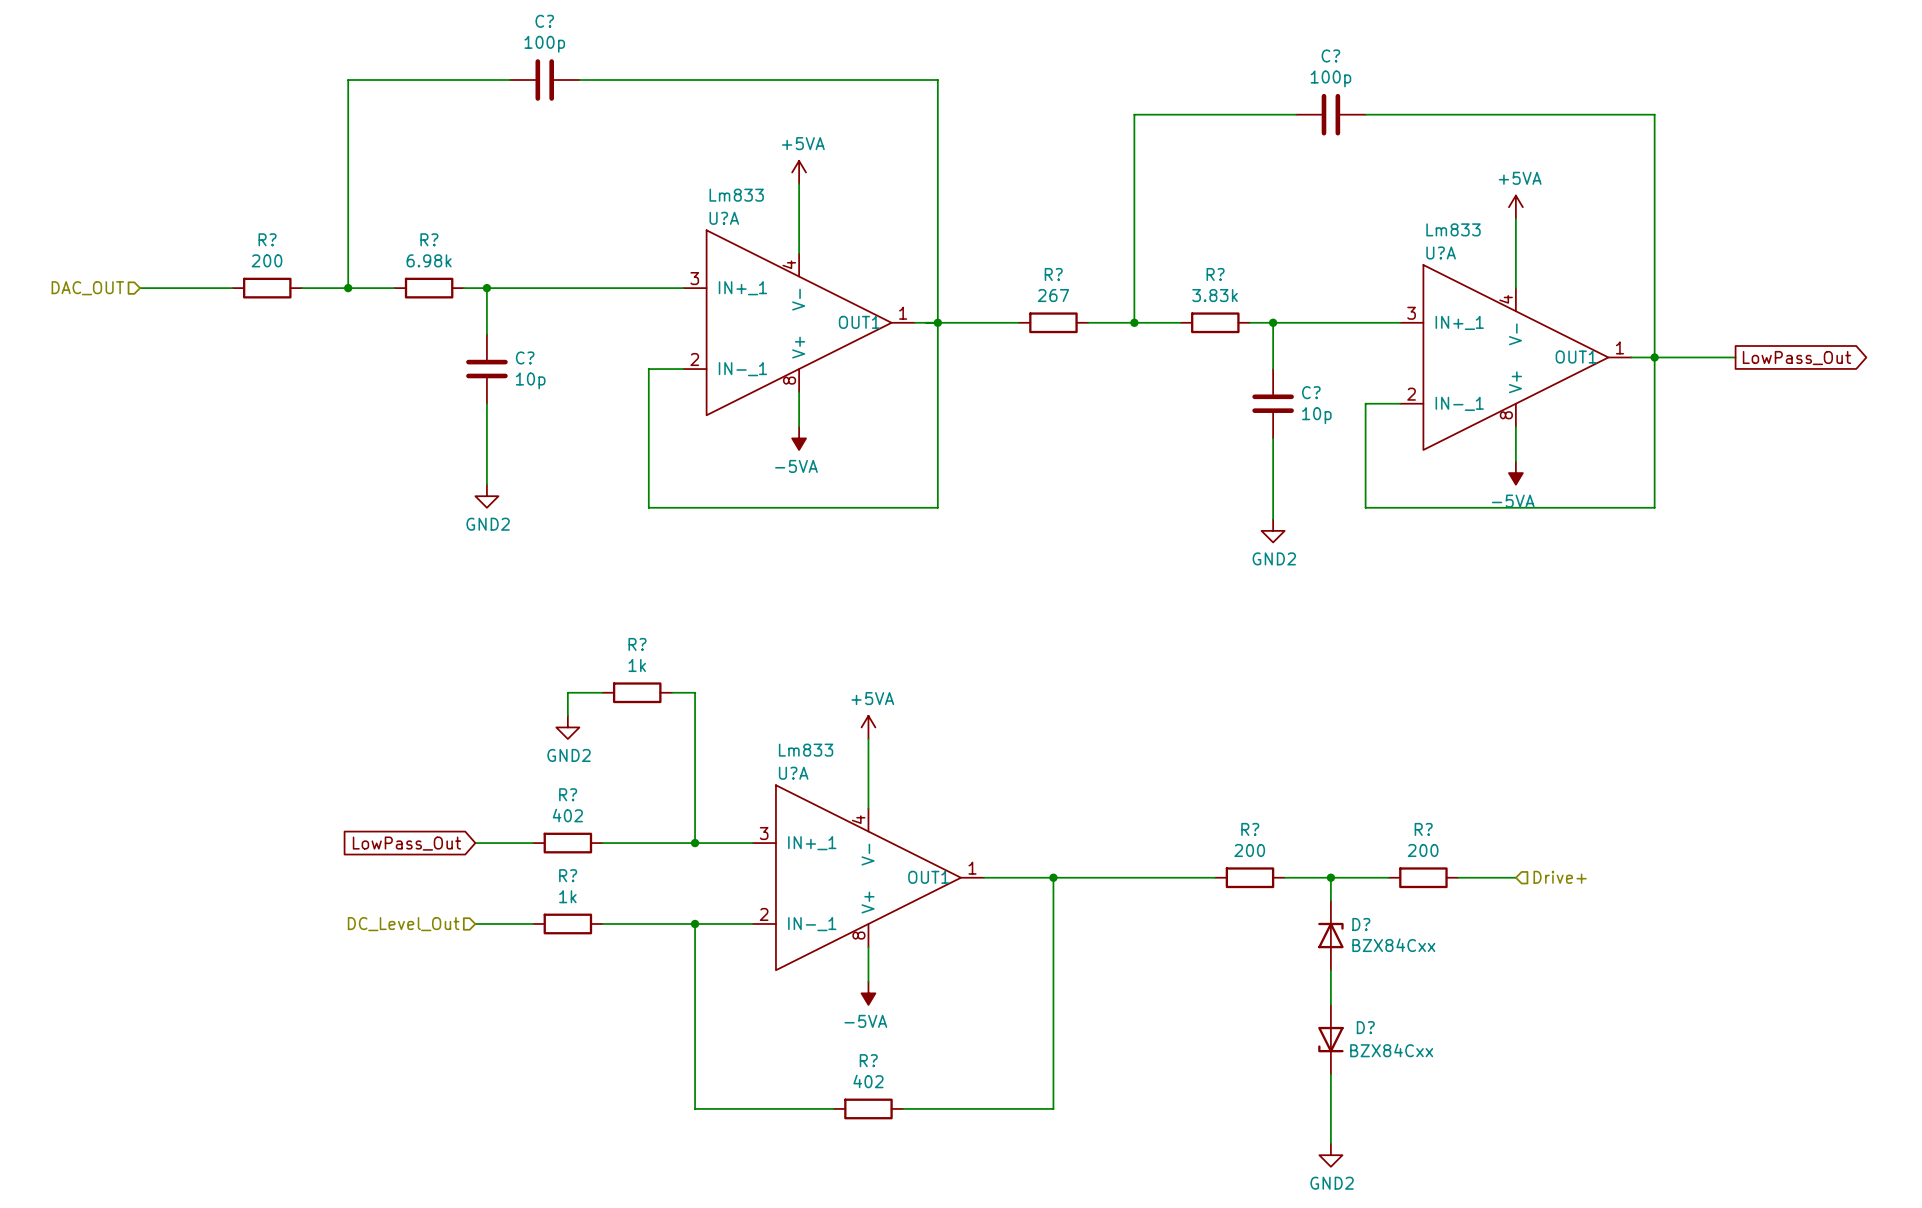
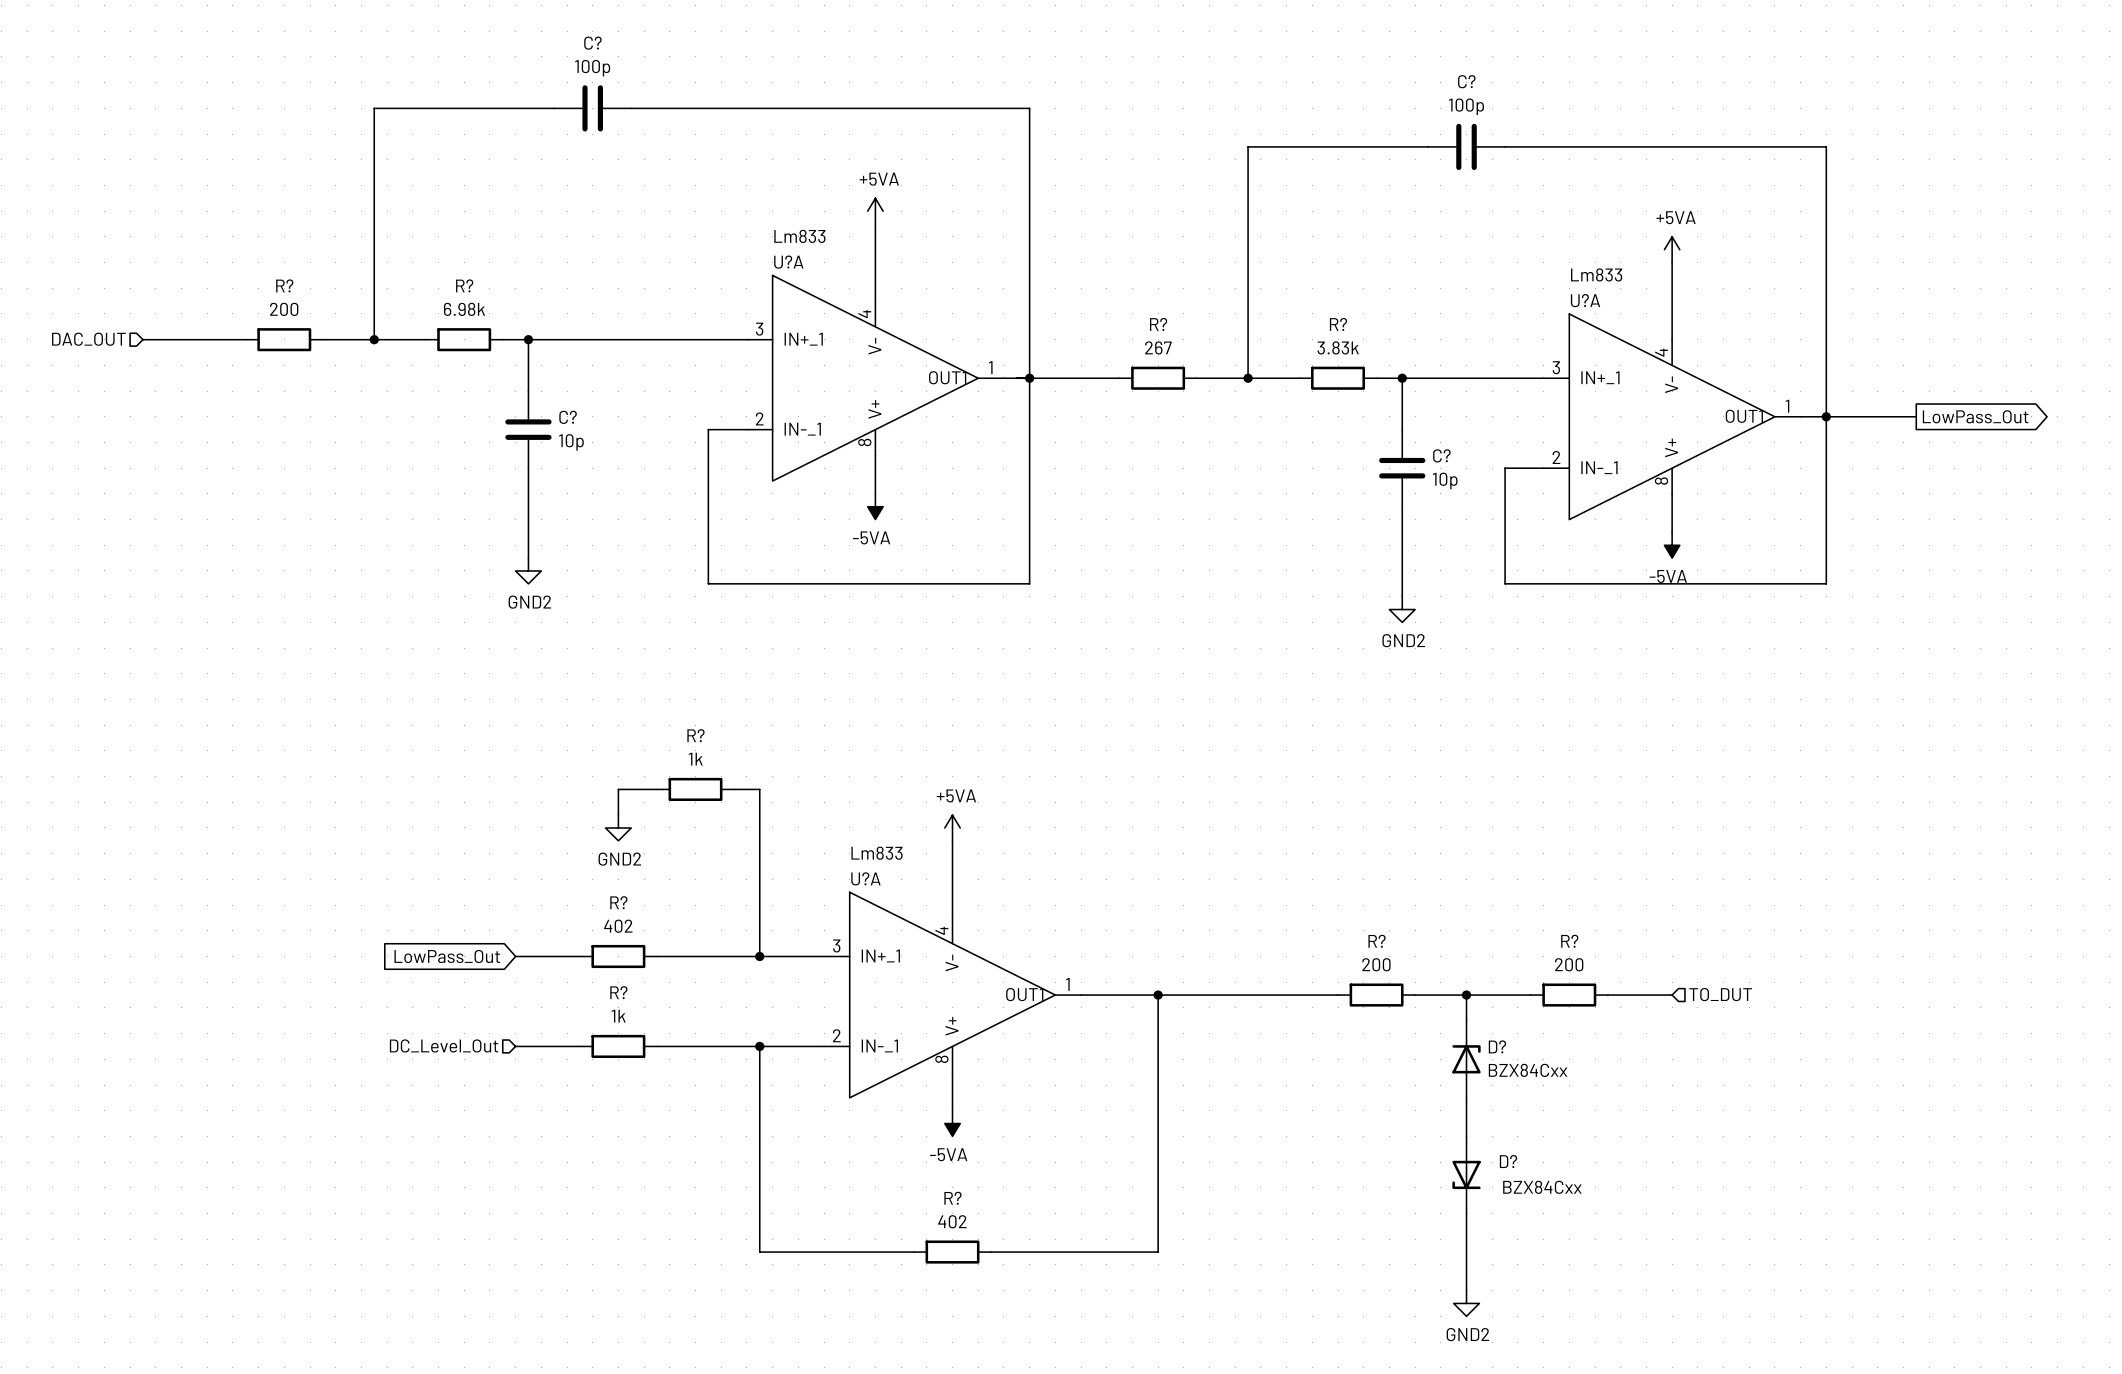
hierarchical label: Drive+ (1560, 877) -> TO_DUT (1720, 994)

